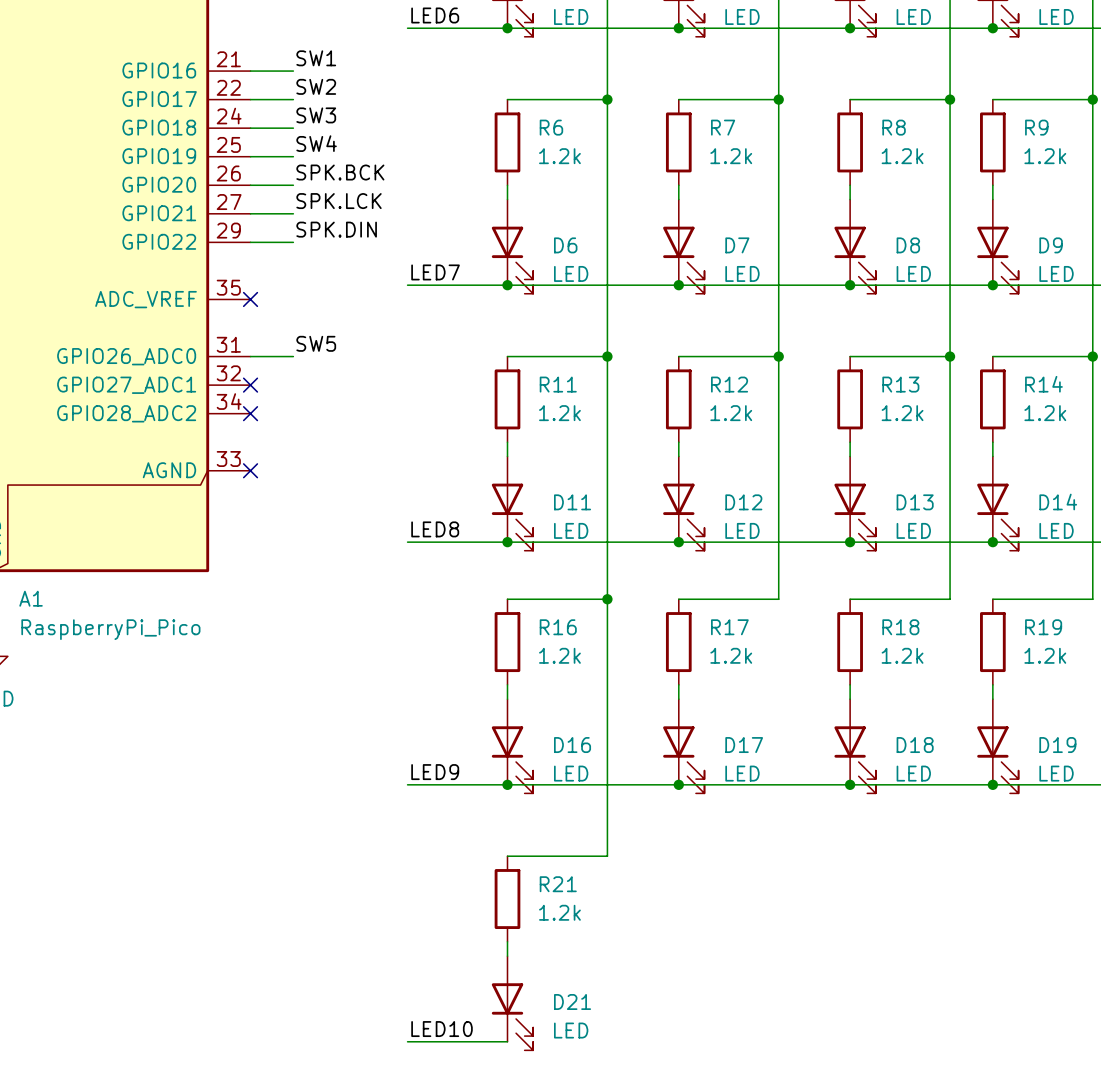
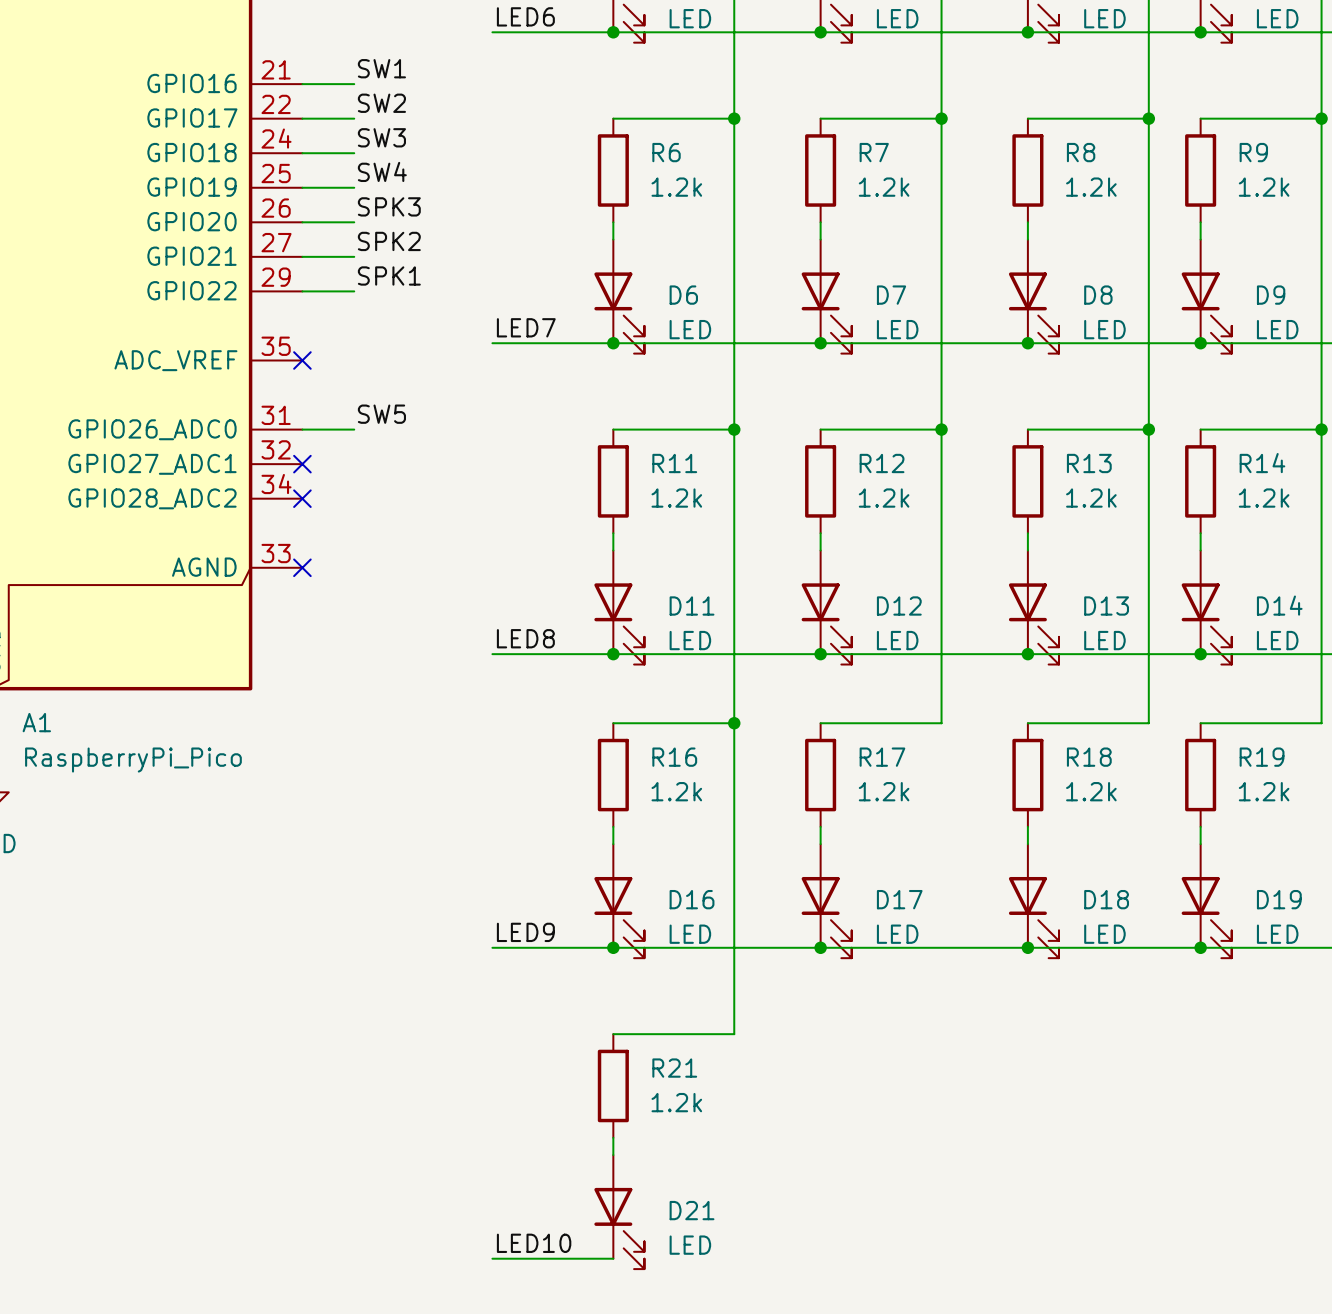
label: SPK.BCK (340, 172) -> SPK3 (389, 206)
label: SPK.LCK (339, 201) -> SPK2 (389, 241)
label: SPK.DIN (336, 229) -> SPK1 (389, 275)

